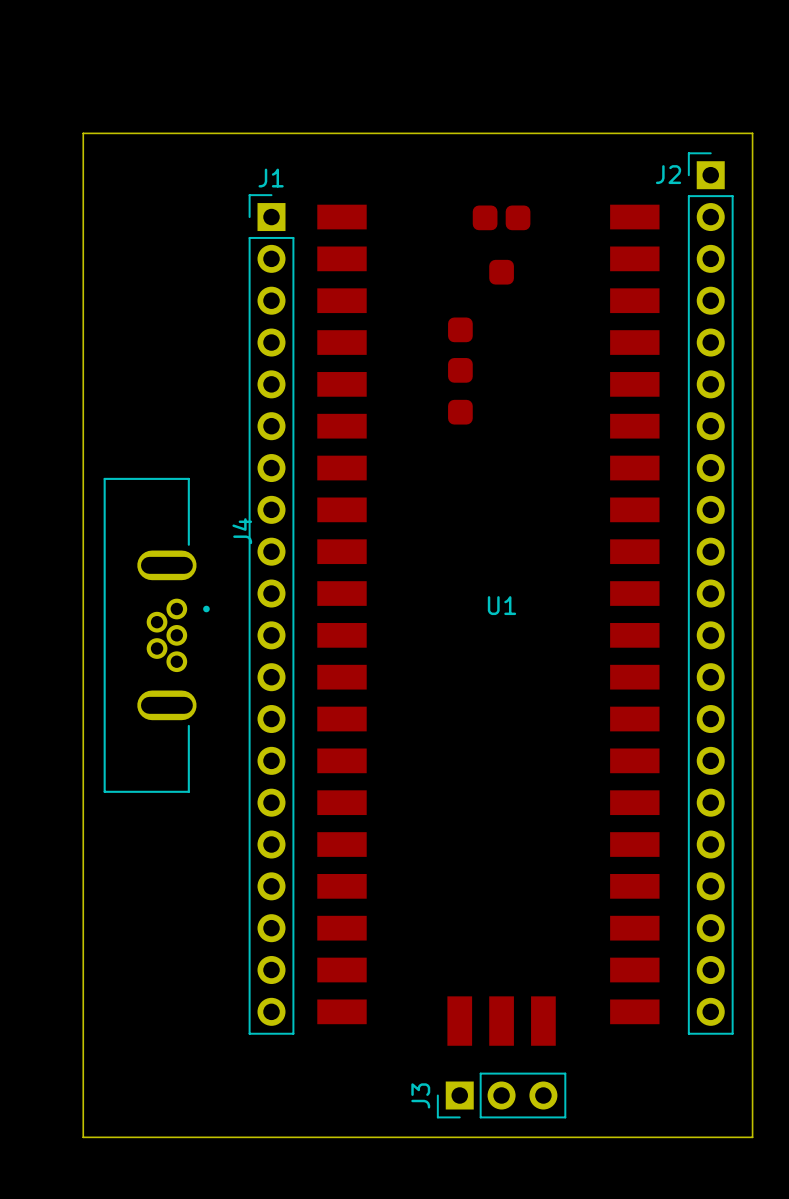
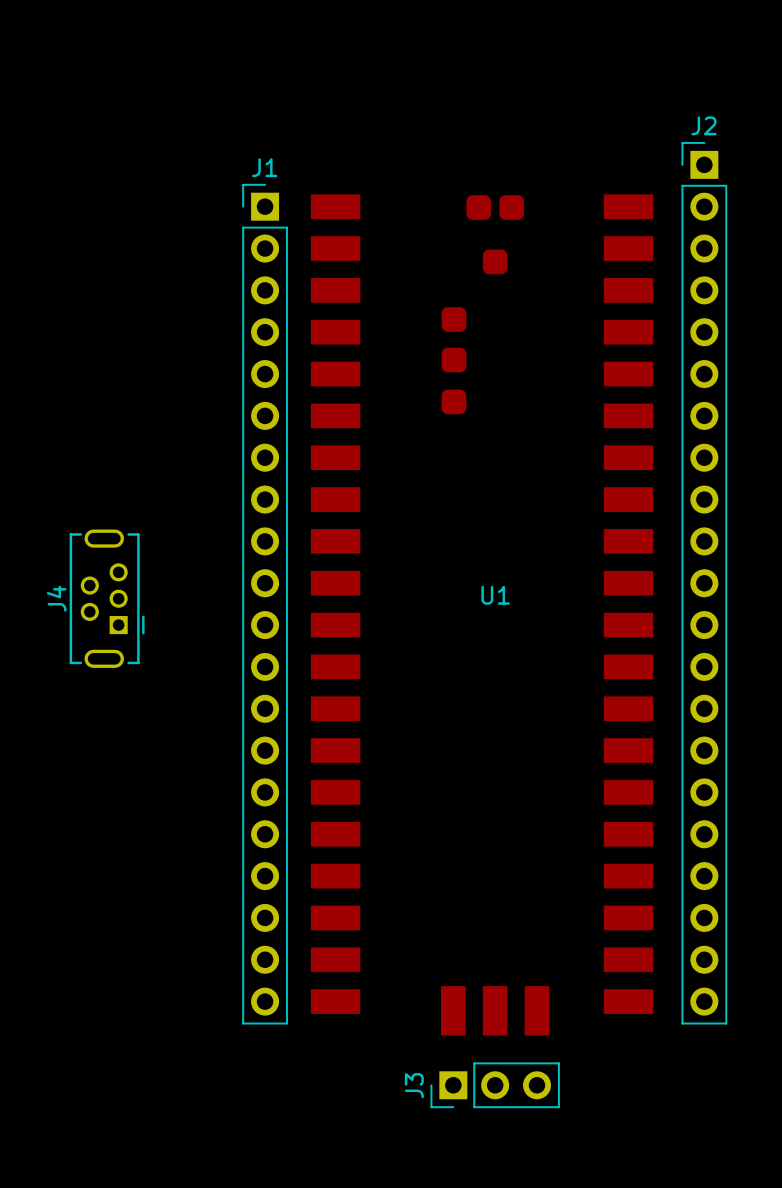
board edge: (83, 133) (752, 133) (752, 1137) (83, 1137) (83, 133) -> none
J2 name position: J2 (668, 174) -> J2 (703, 125)
J4 footprint: [103, 477, 210, 793] -> [69, 529, 145, 668]
J4 name position: J4 (242, 531) -> J4 (56, 598)

